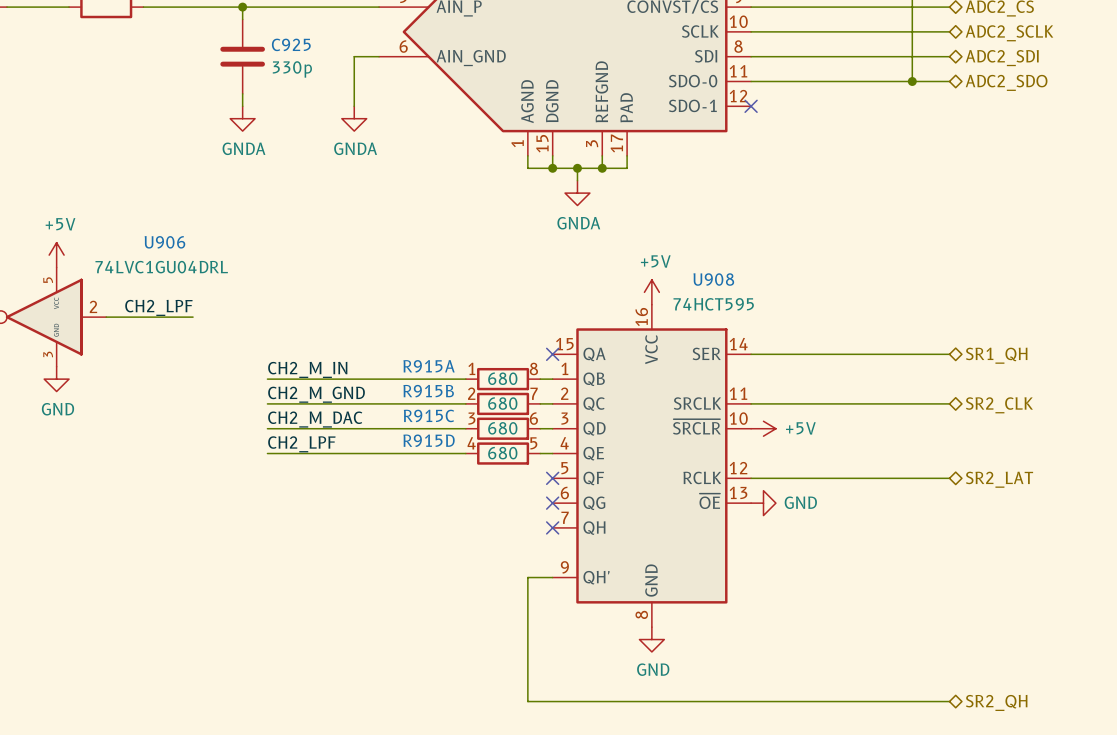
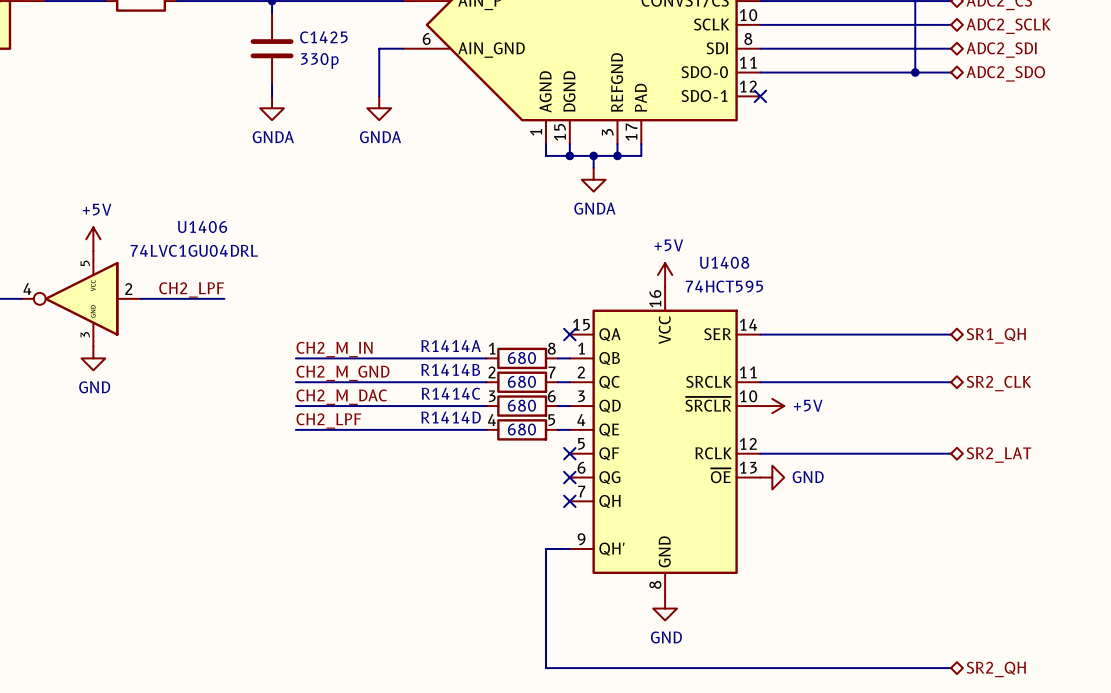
C925 name: C925 (291, 44) -> C1425 (323, 37)
U906 name: U906 (164, 242) -> U1406 (202, 227)
U908 name: U908 (713, 279) -> U1408 (724, 262)
R915A name: R915A (429, 366) -> R1414A (451, 346)
R915B name: R915B (428, 391) -> R1414B (450, 369)
R915C name: R915C (428, 415) -> R1414C (451, 393)
R915D name: R915D (429, 440) -> R1414D (451, 417)

